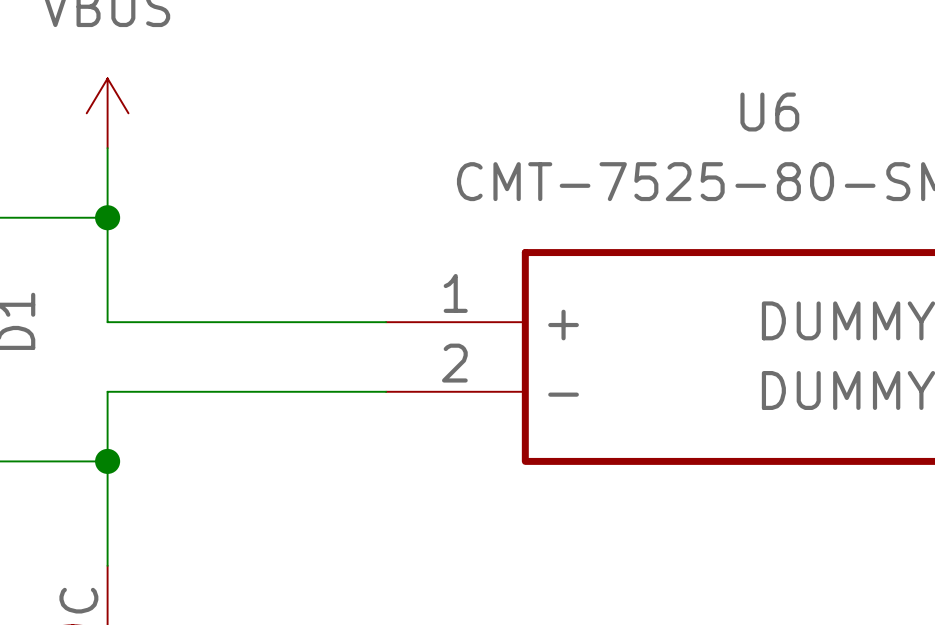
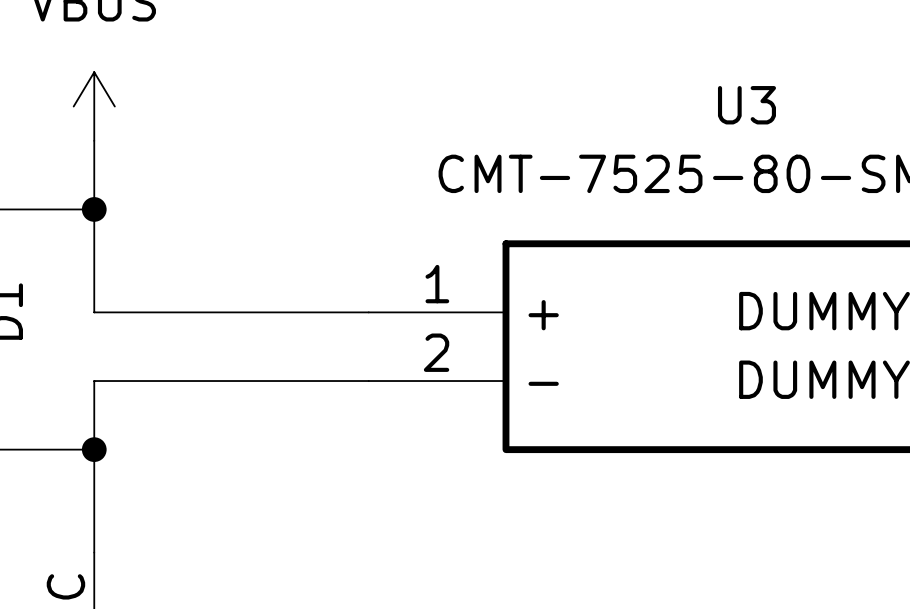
U6 name: U6 (769, 112) -> U3 (746, 105)

